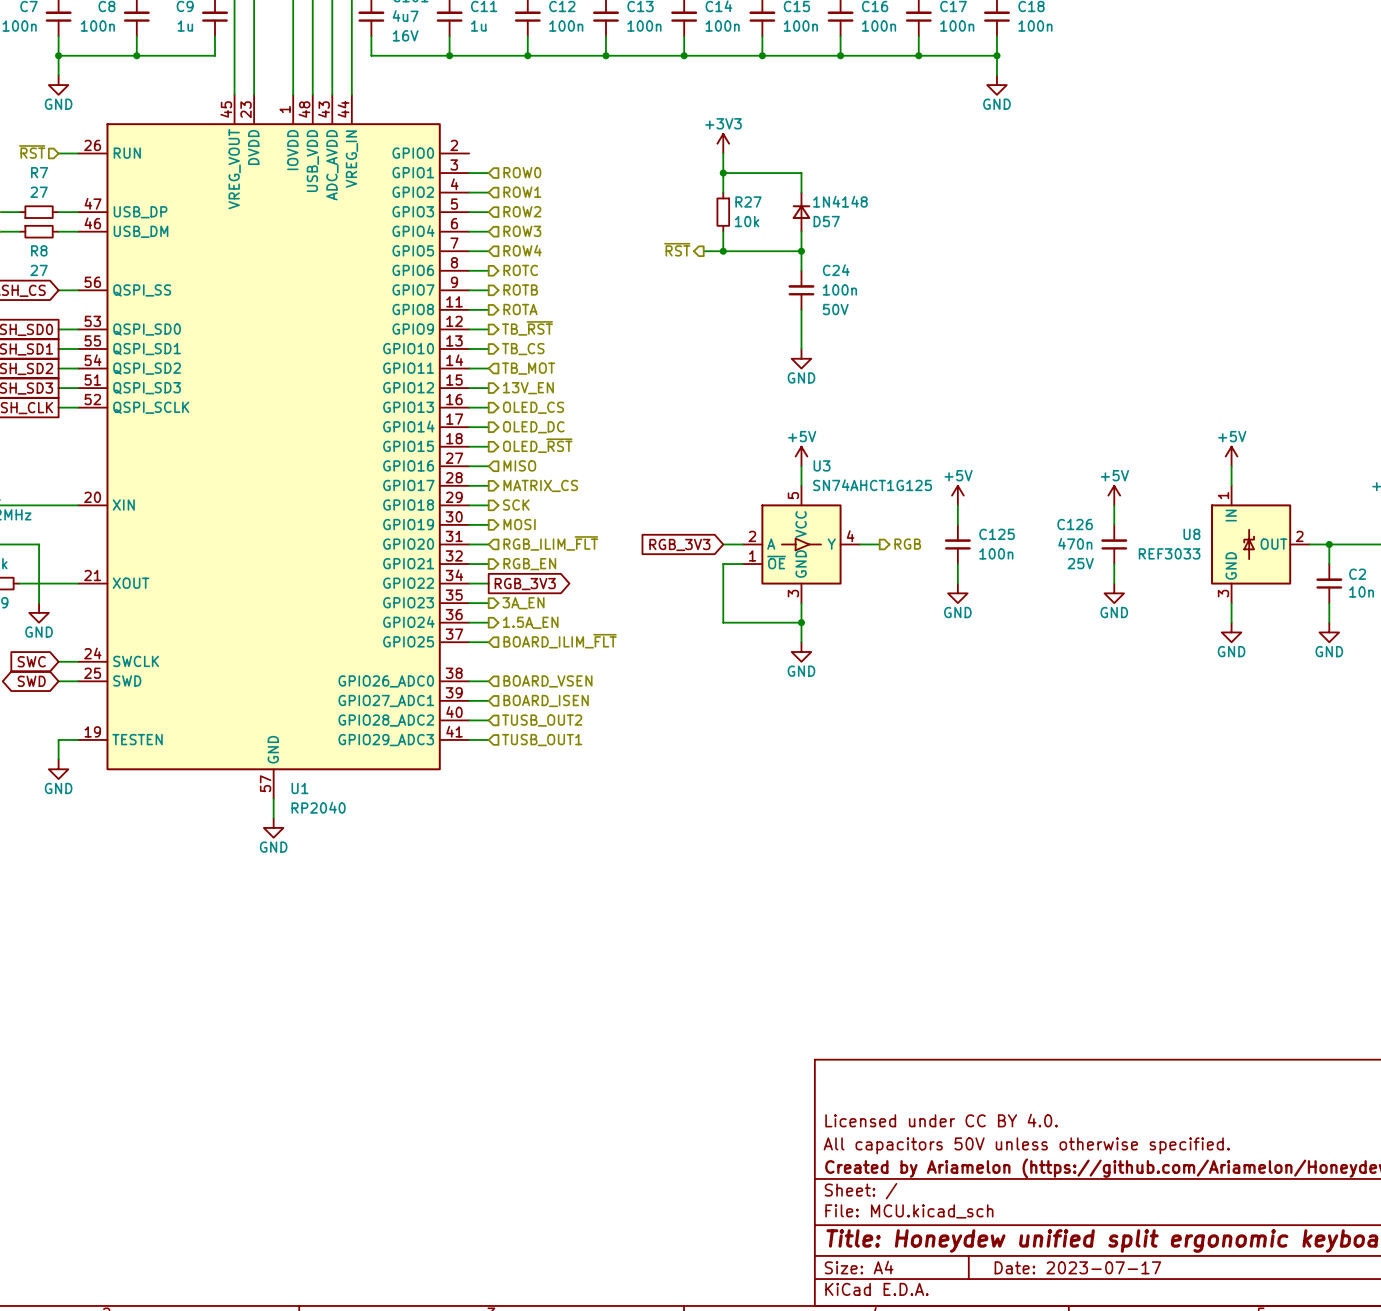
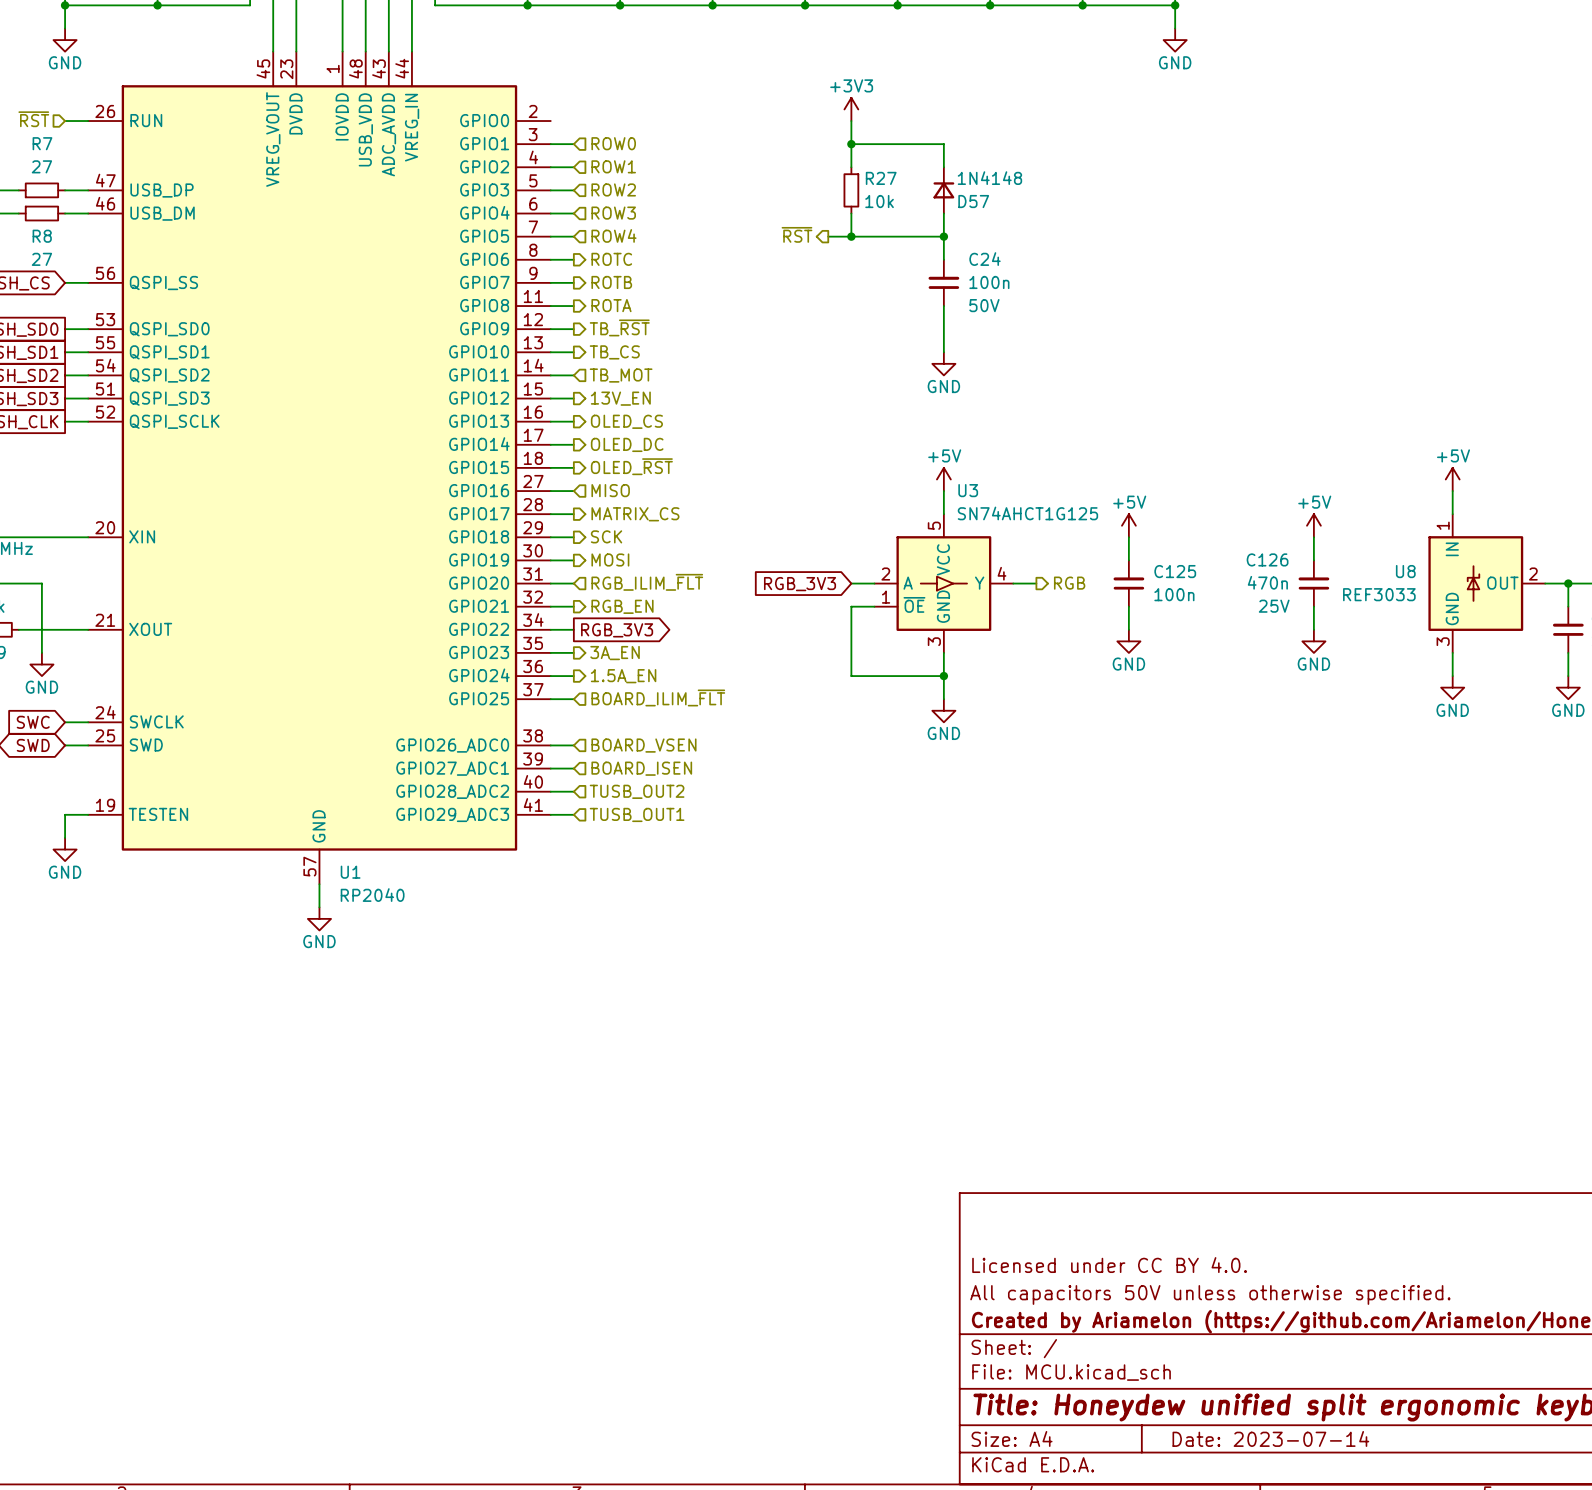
title block: Date: 2023-07-17 (1077, 1267) -> Date: 2023-07-14 (1270, 1438)

